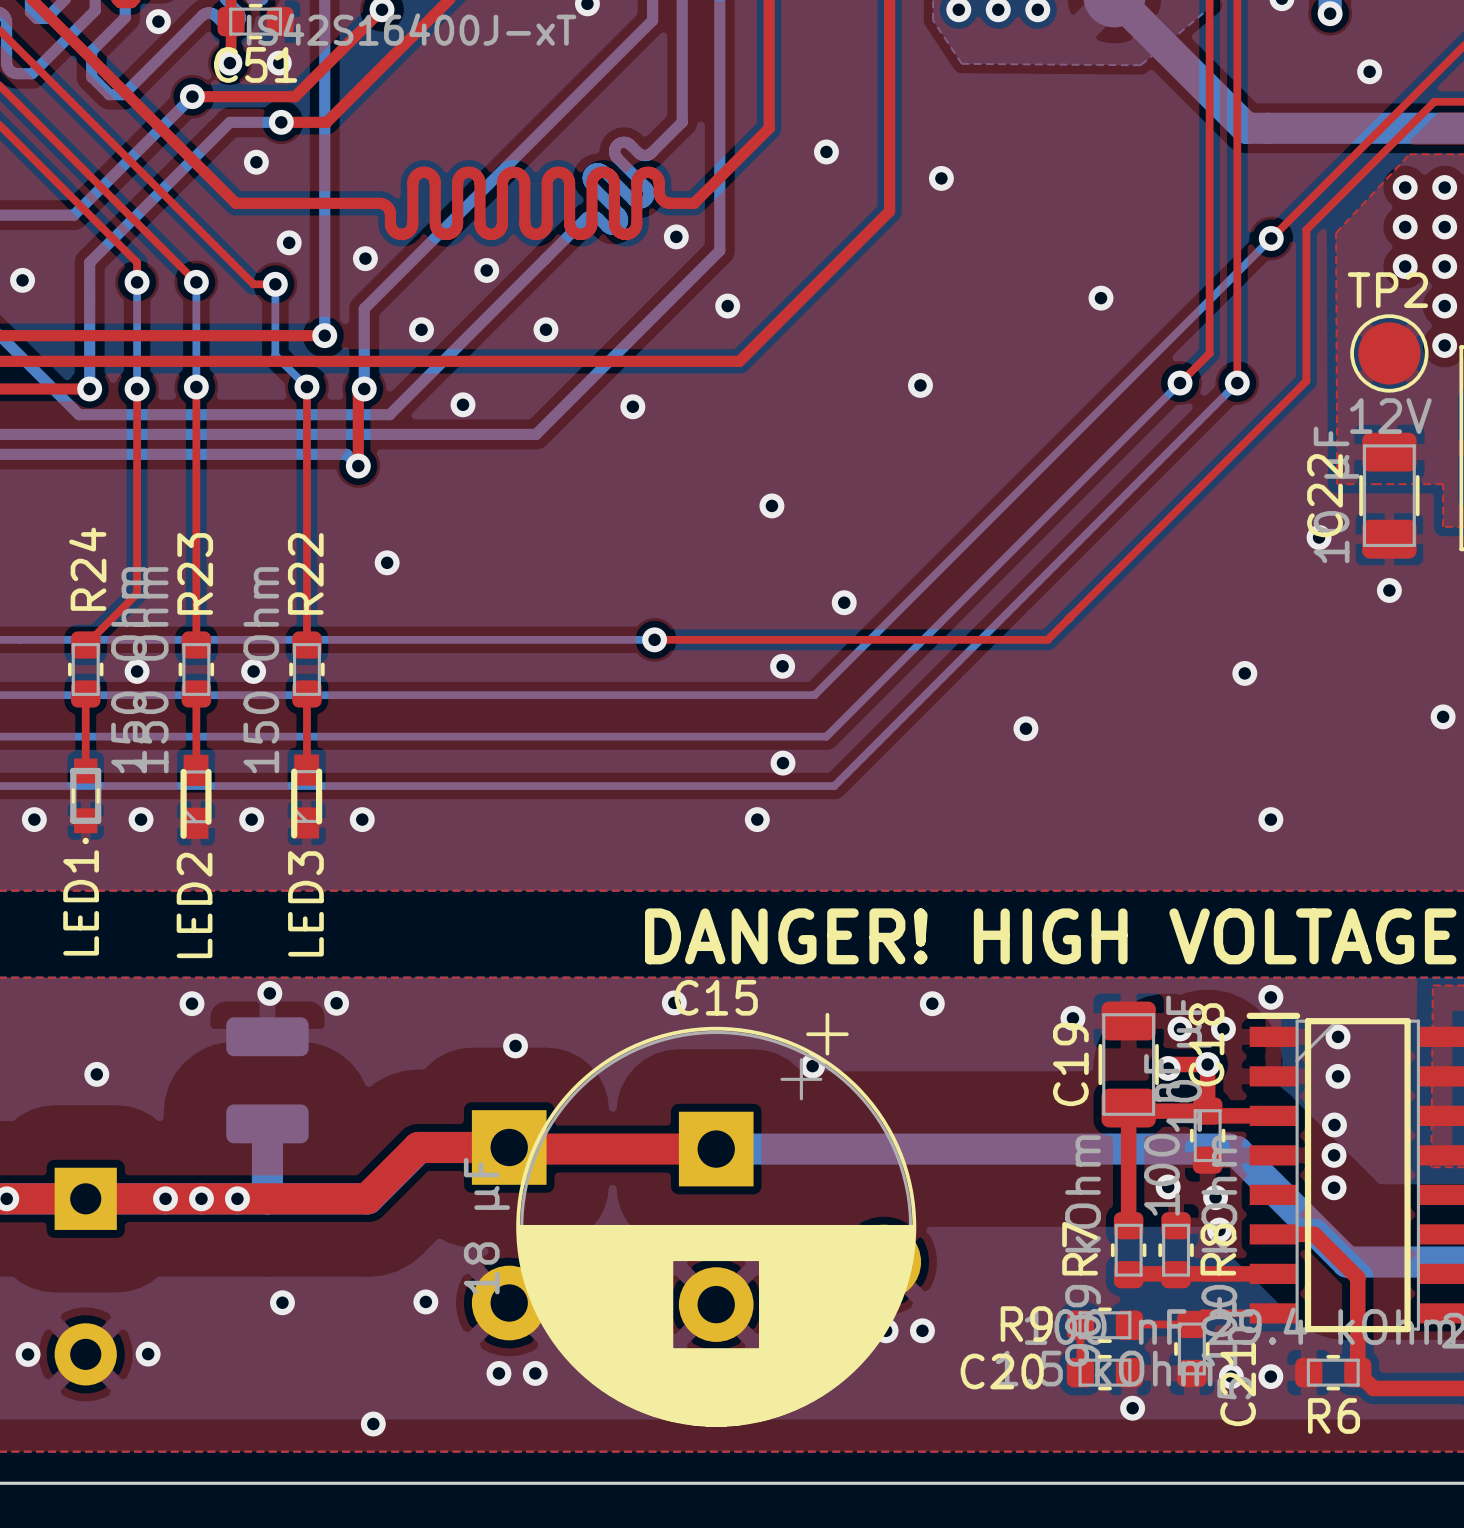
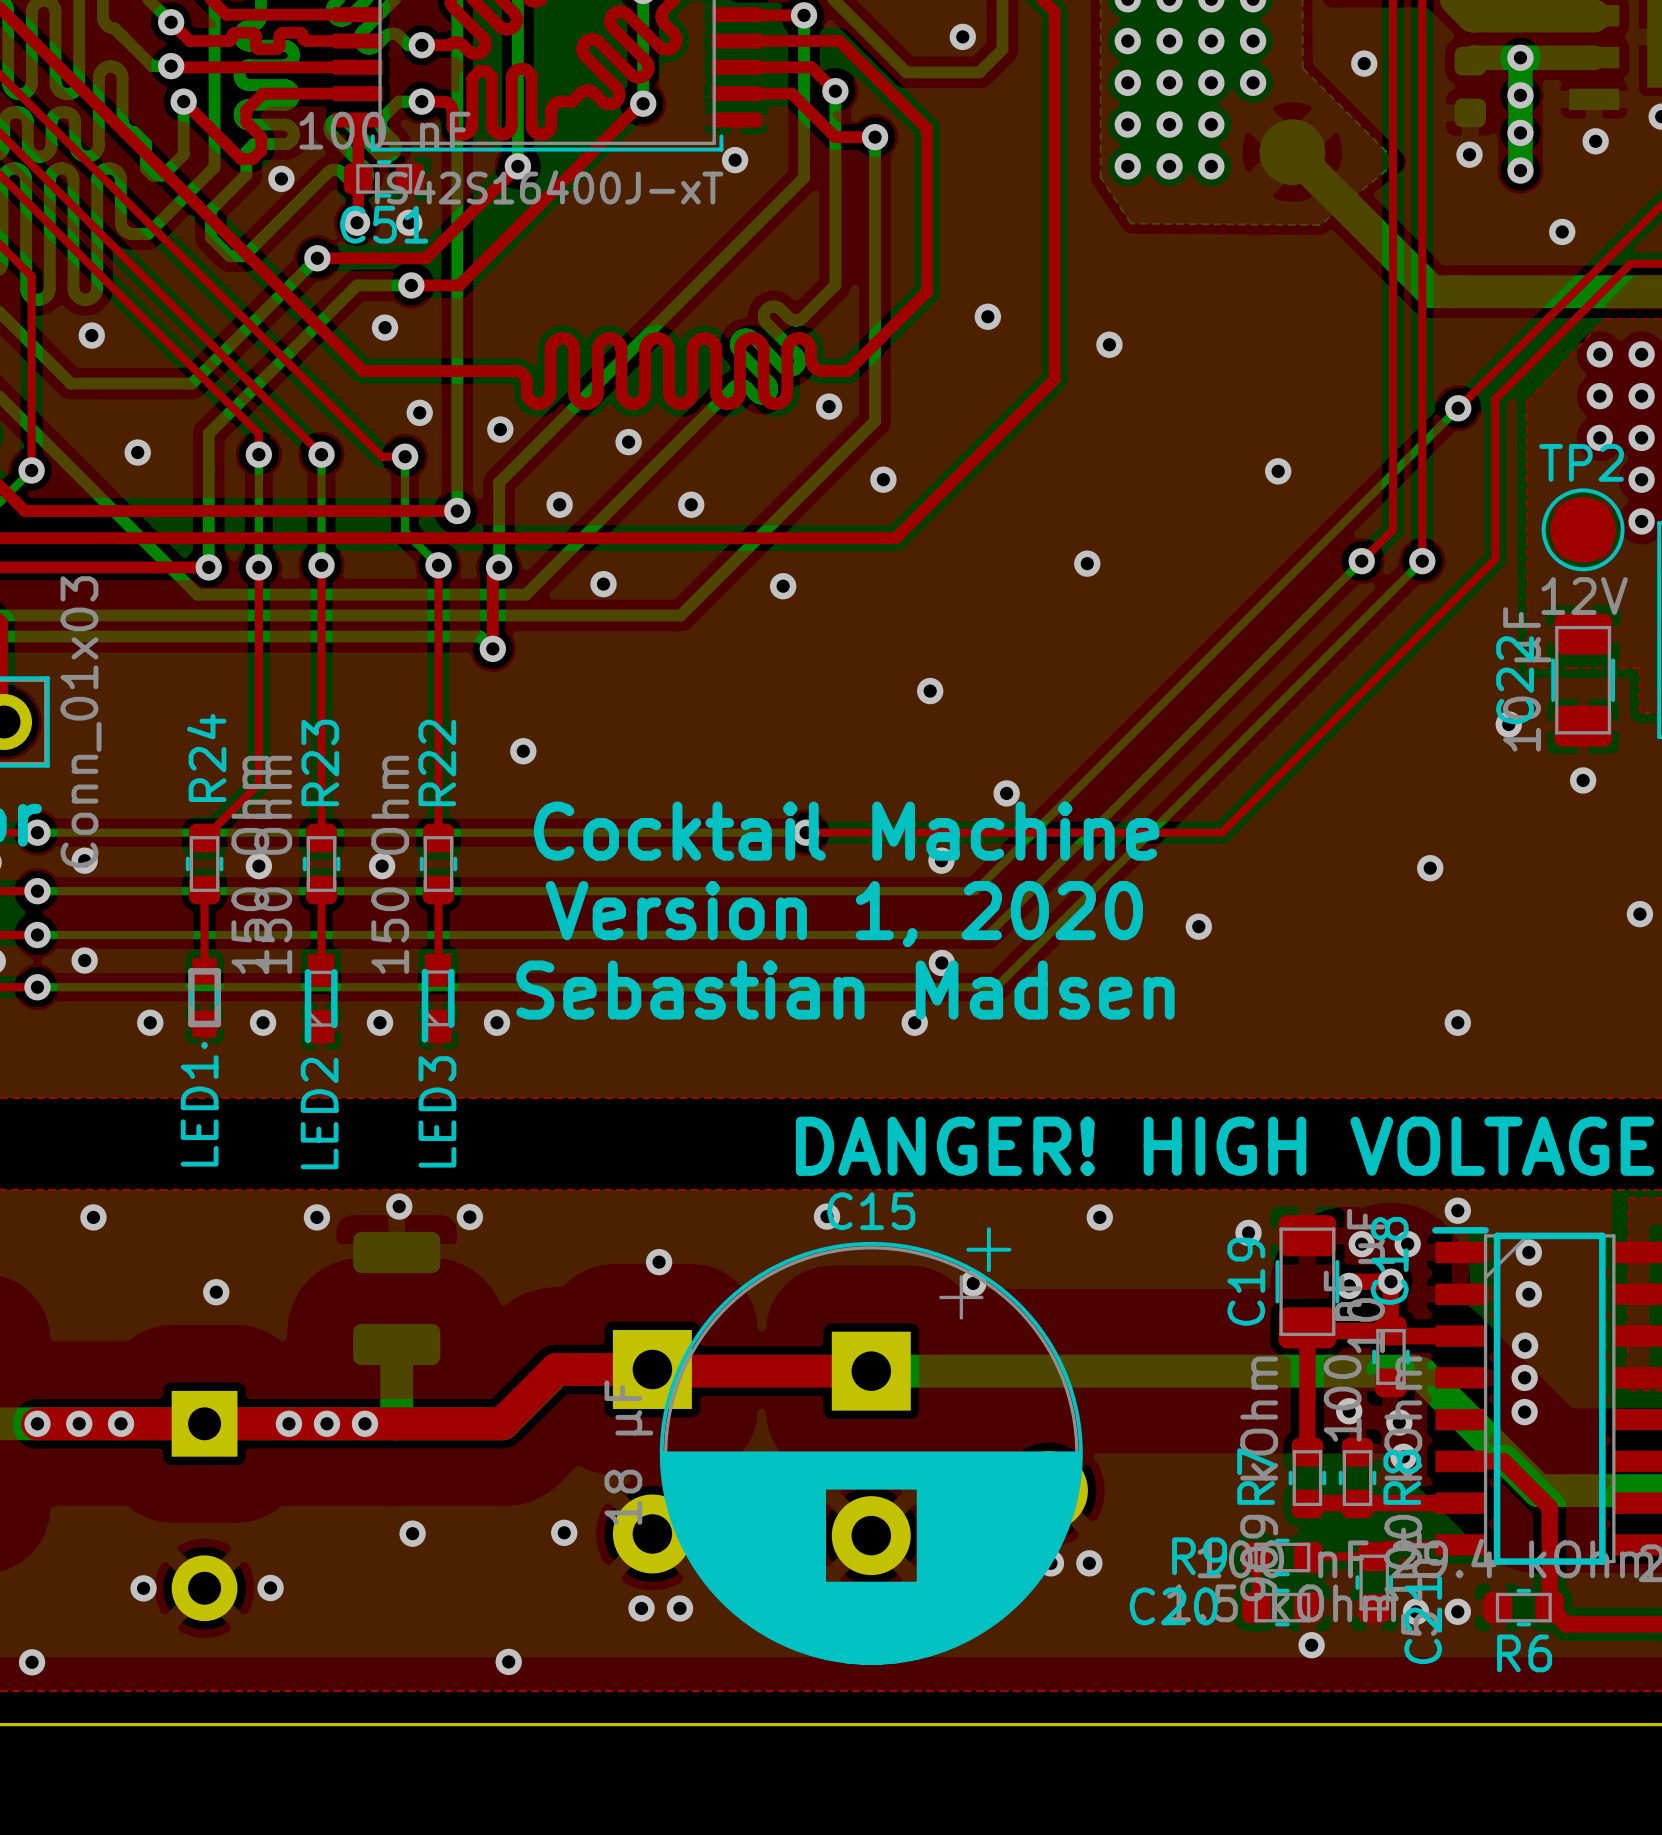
text: none -> Cocktail Machine (846, 831)
text: none -> Version 1, 2020 (844, 914)
text: none -> Sebastian Madsen (845, 990)

